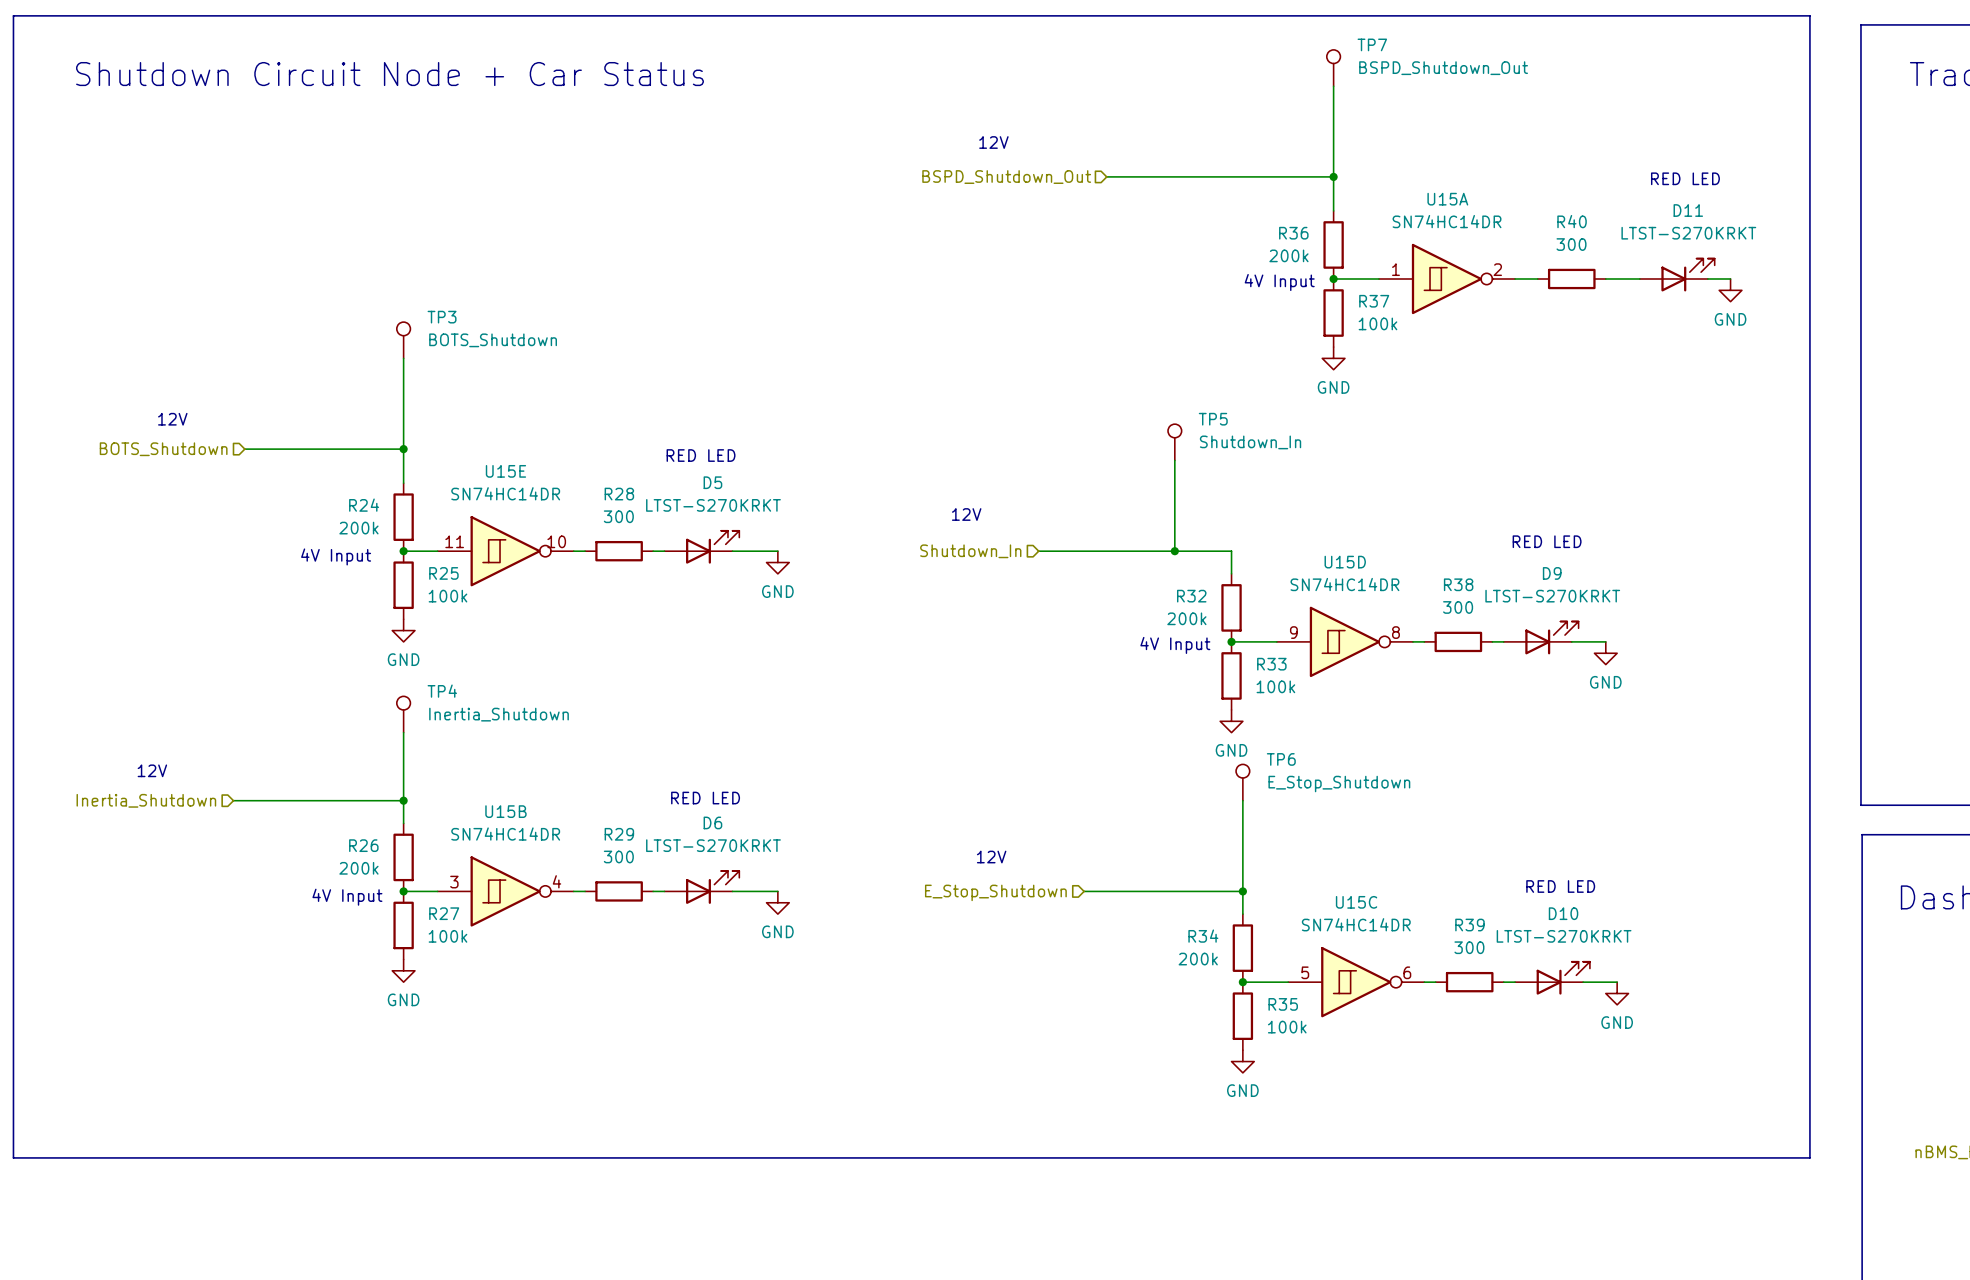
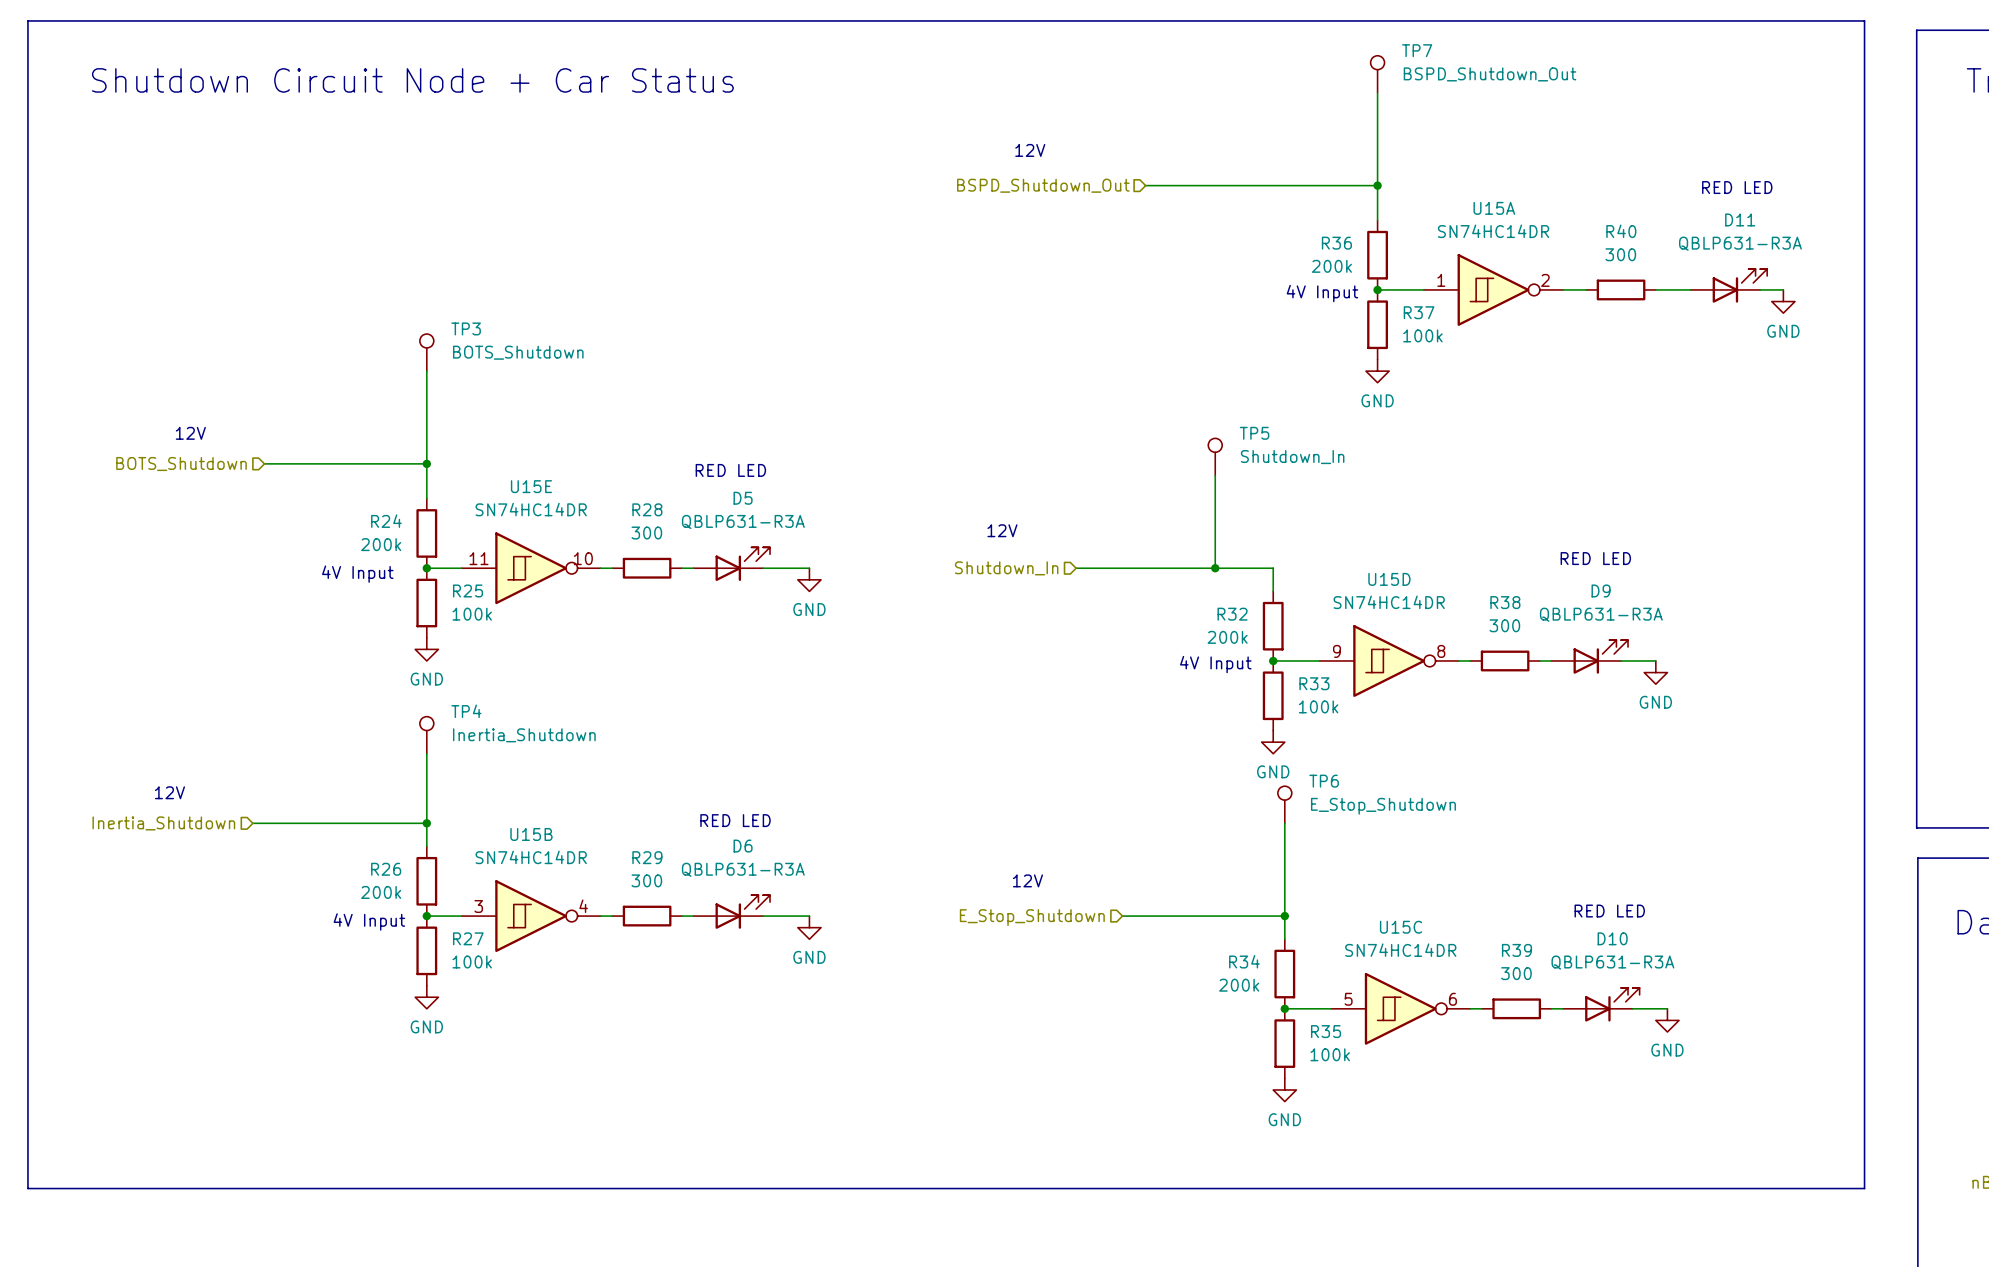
D11 value: LTST-S270KRKT (1688, 233) -> QBLP631-R3A (1740, 243)
D5 value: LTST-S270KRKT (713, 505) -> QBLP631-R3A (743, 521)
D9 value: LTST-S270KRKT (1552, 596) -> QBLP631-R3A (1601, 614)
D6 value: LTST-S270KRKT (713, 845) -> QBLP631-R3A (743, 869)
D10 value: LTST-S270KRKT (1564, 936) -> QBLP631-R3A (1612, 962)

